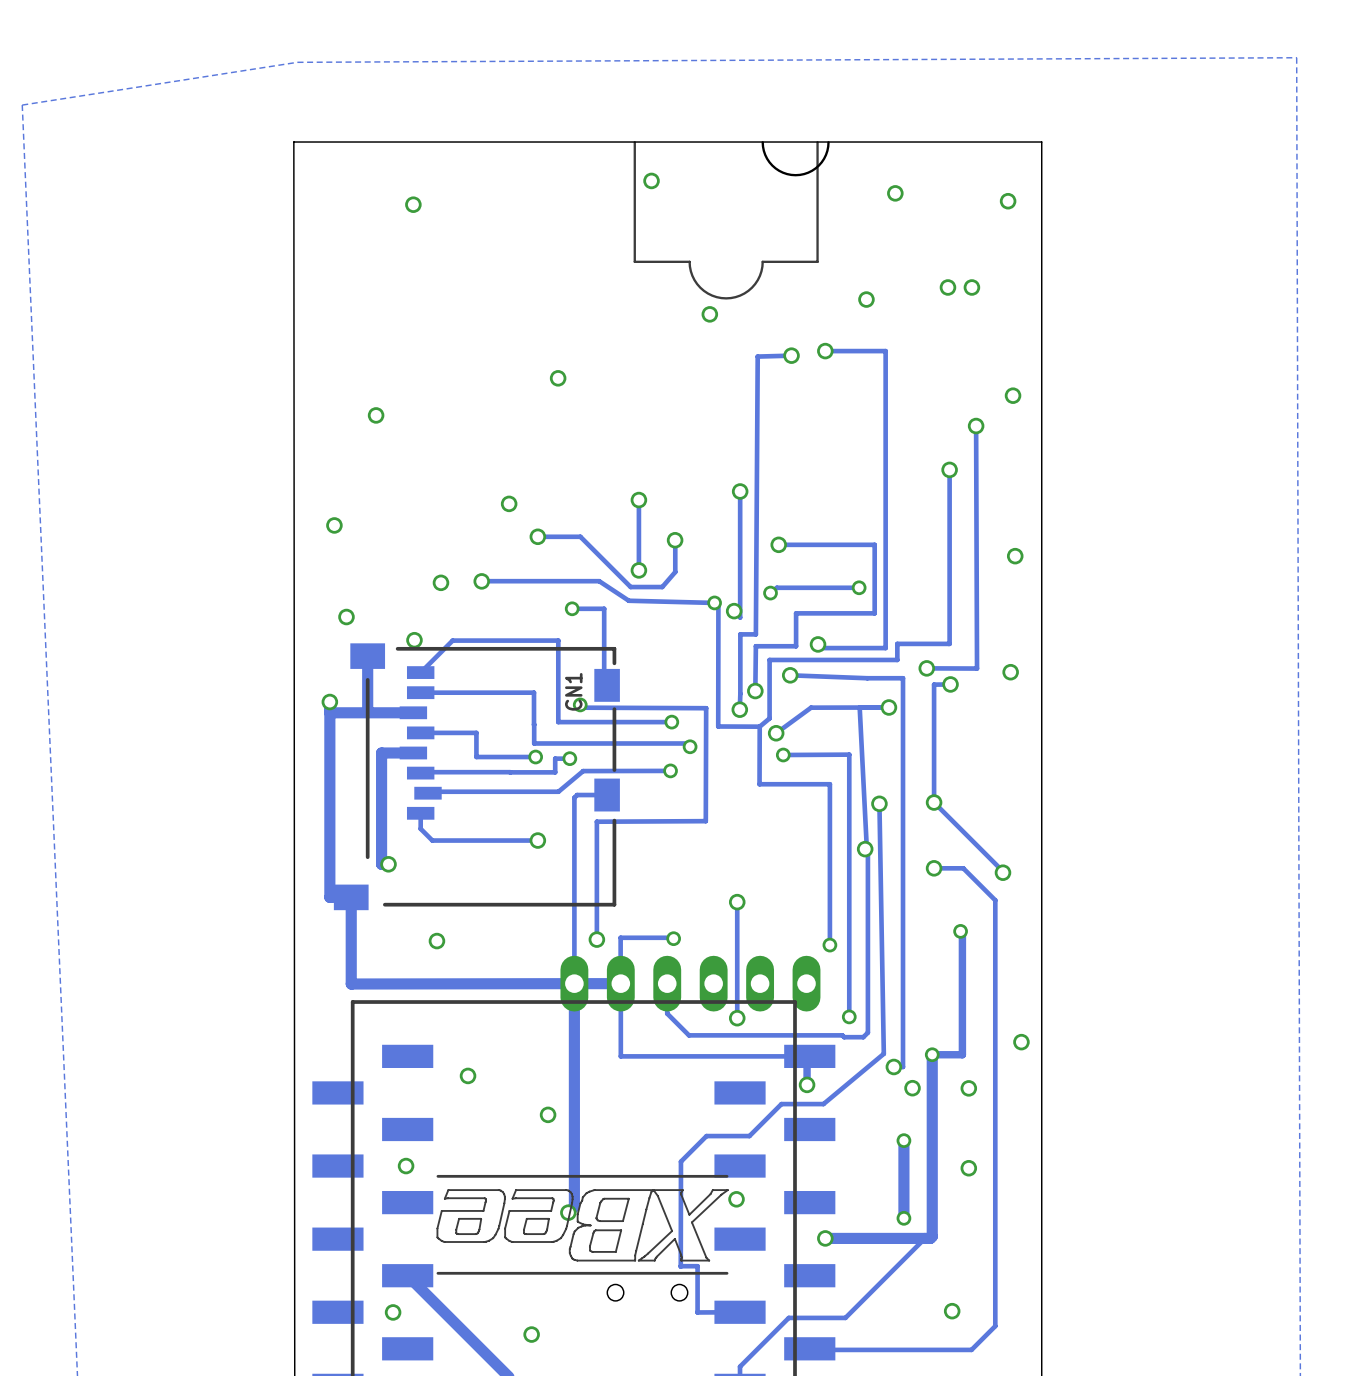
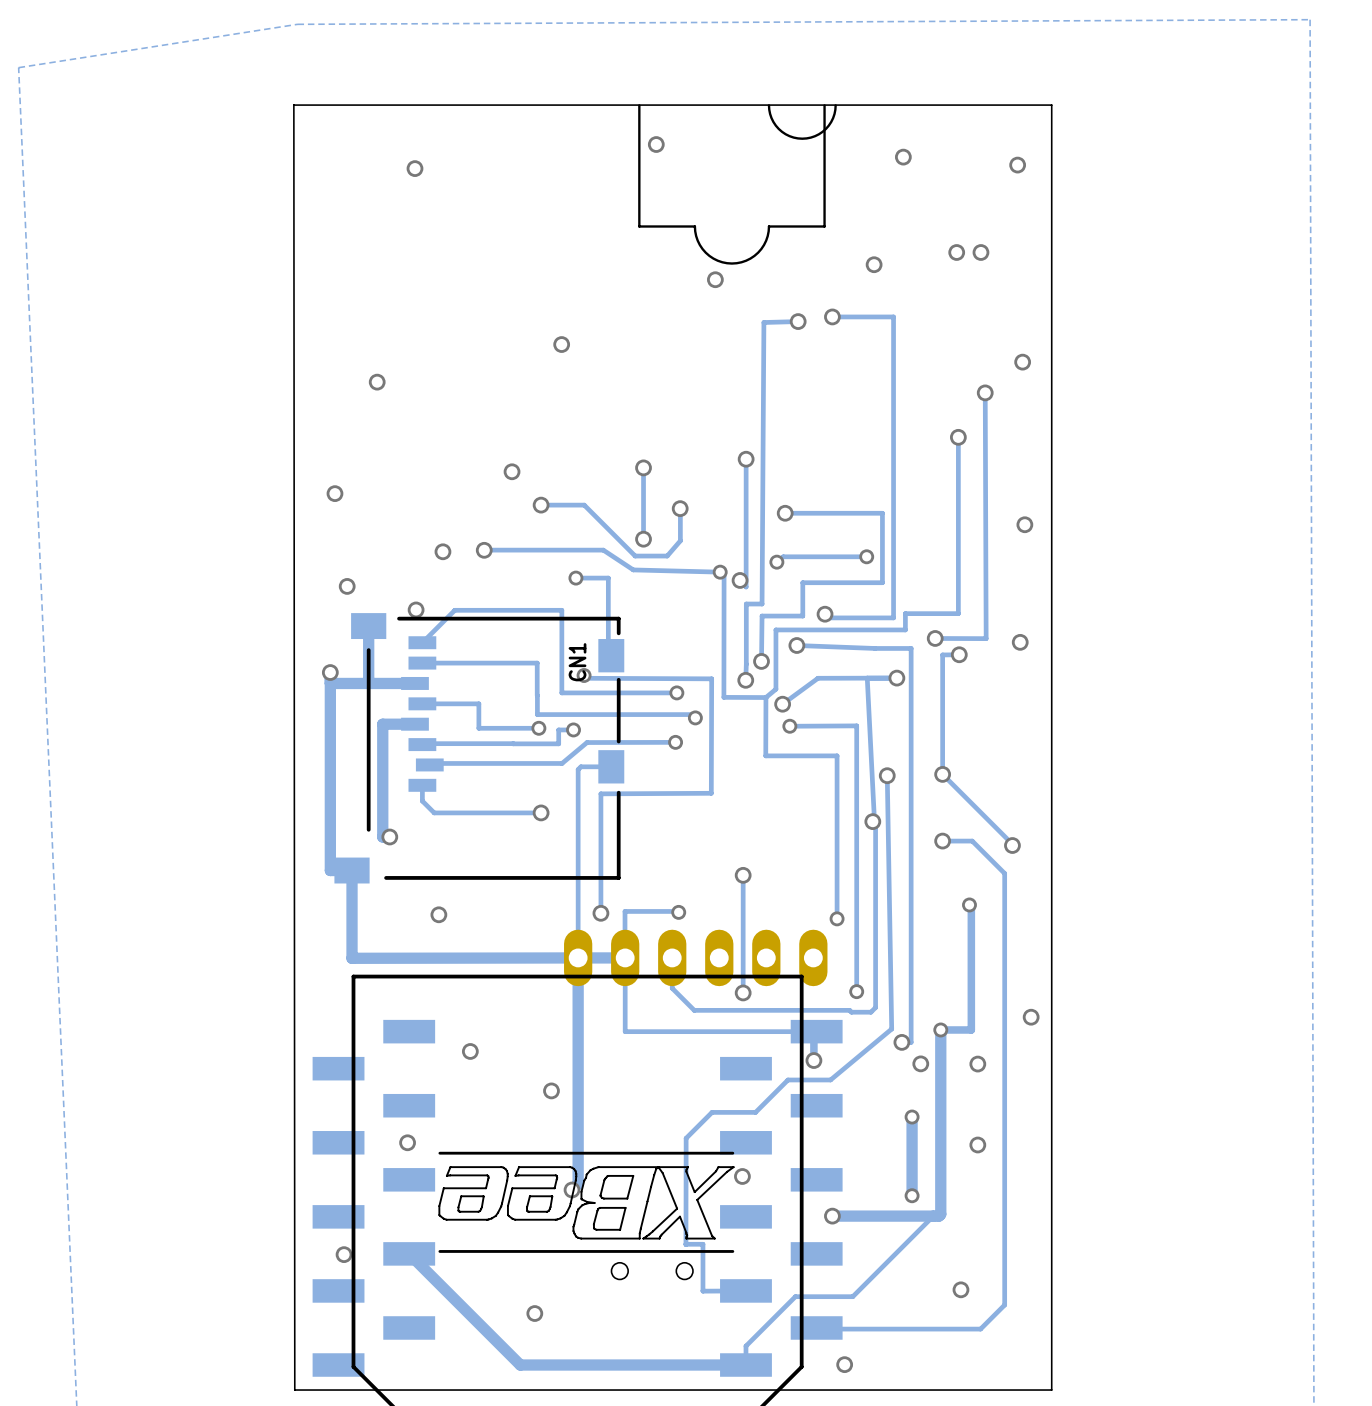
via position: (393, 1312) -> (344, 1254)

